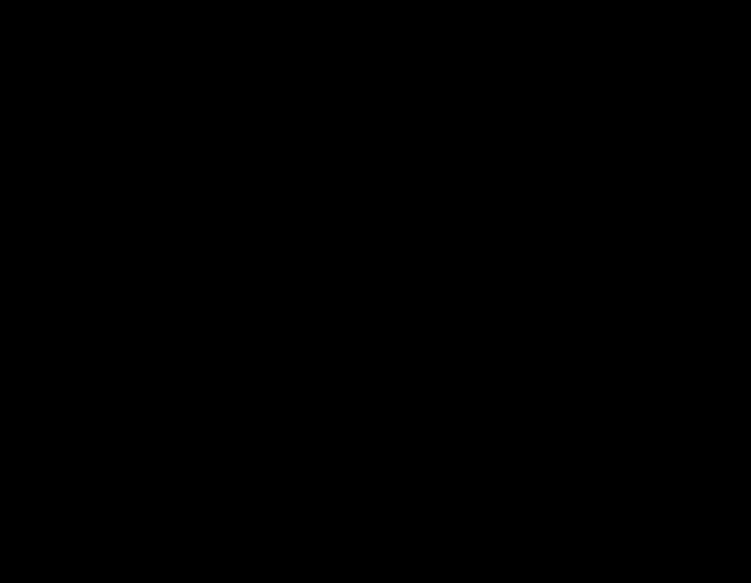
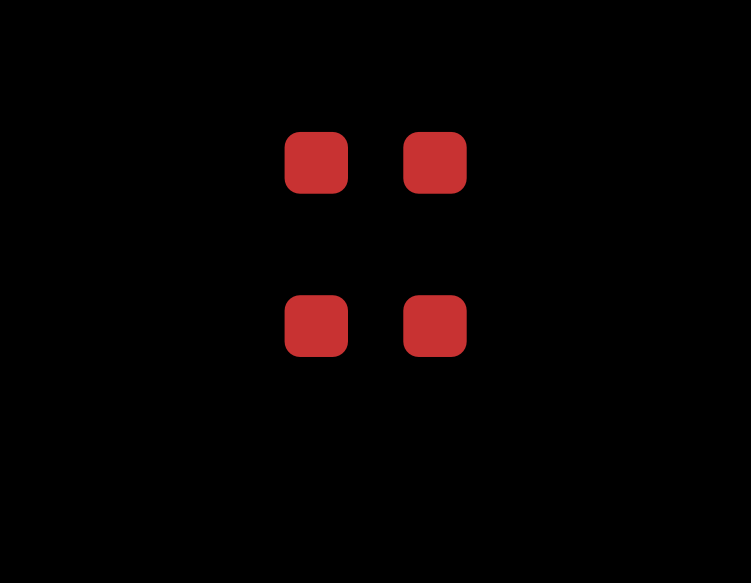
part: none -> (375, 162)
part: none -> (375, 326)

